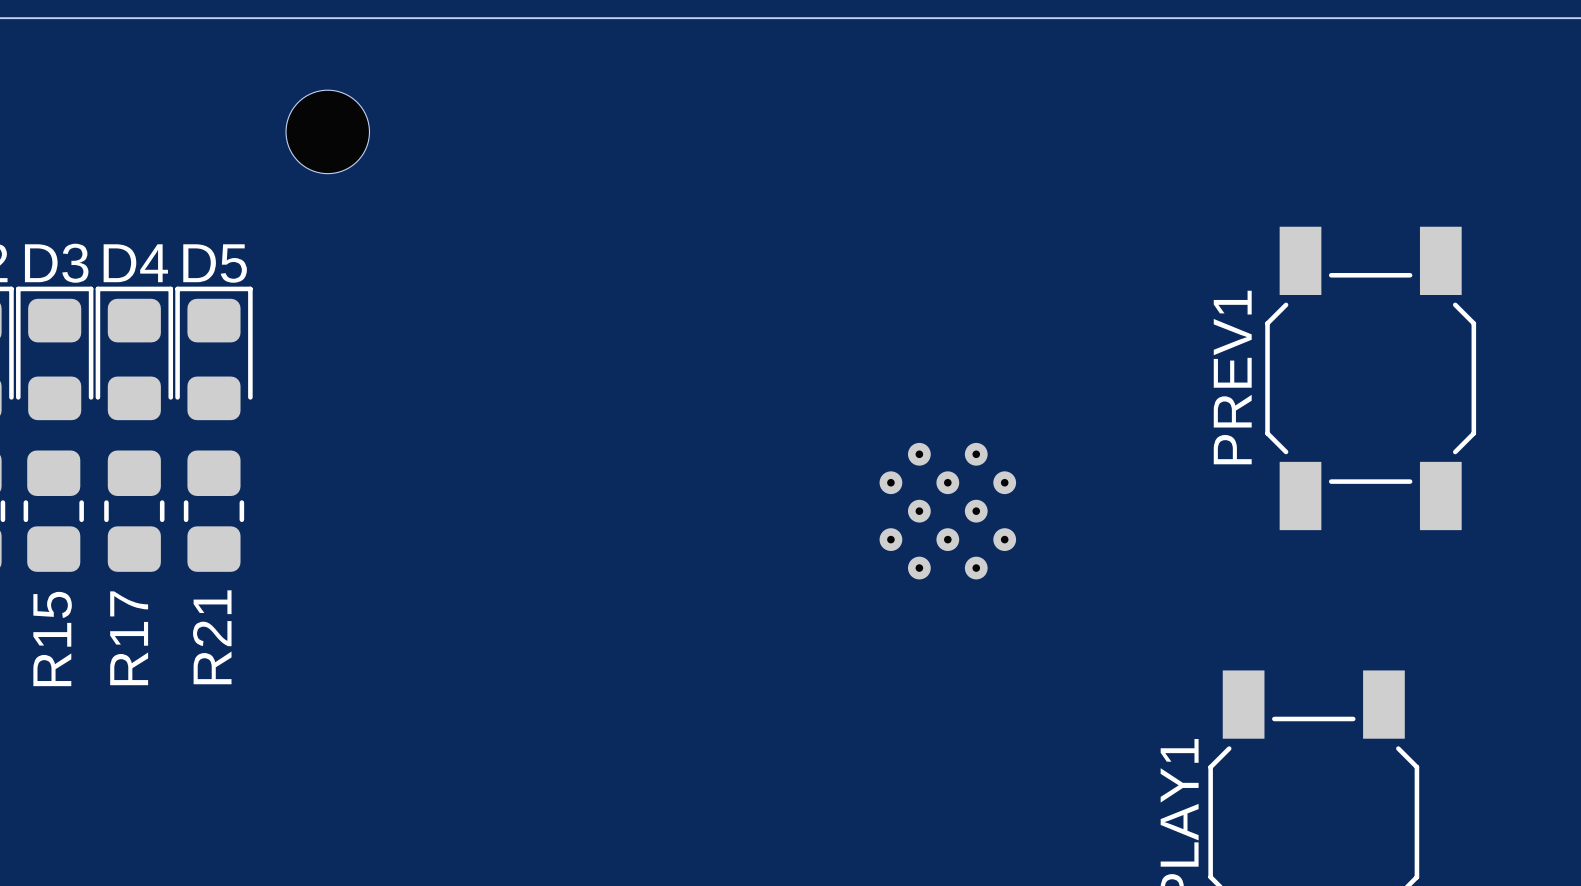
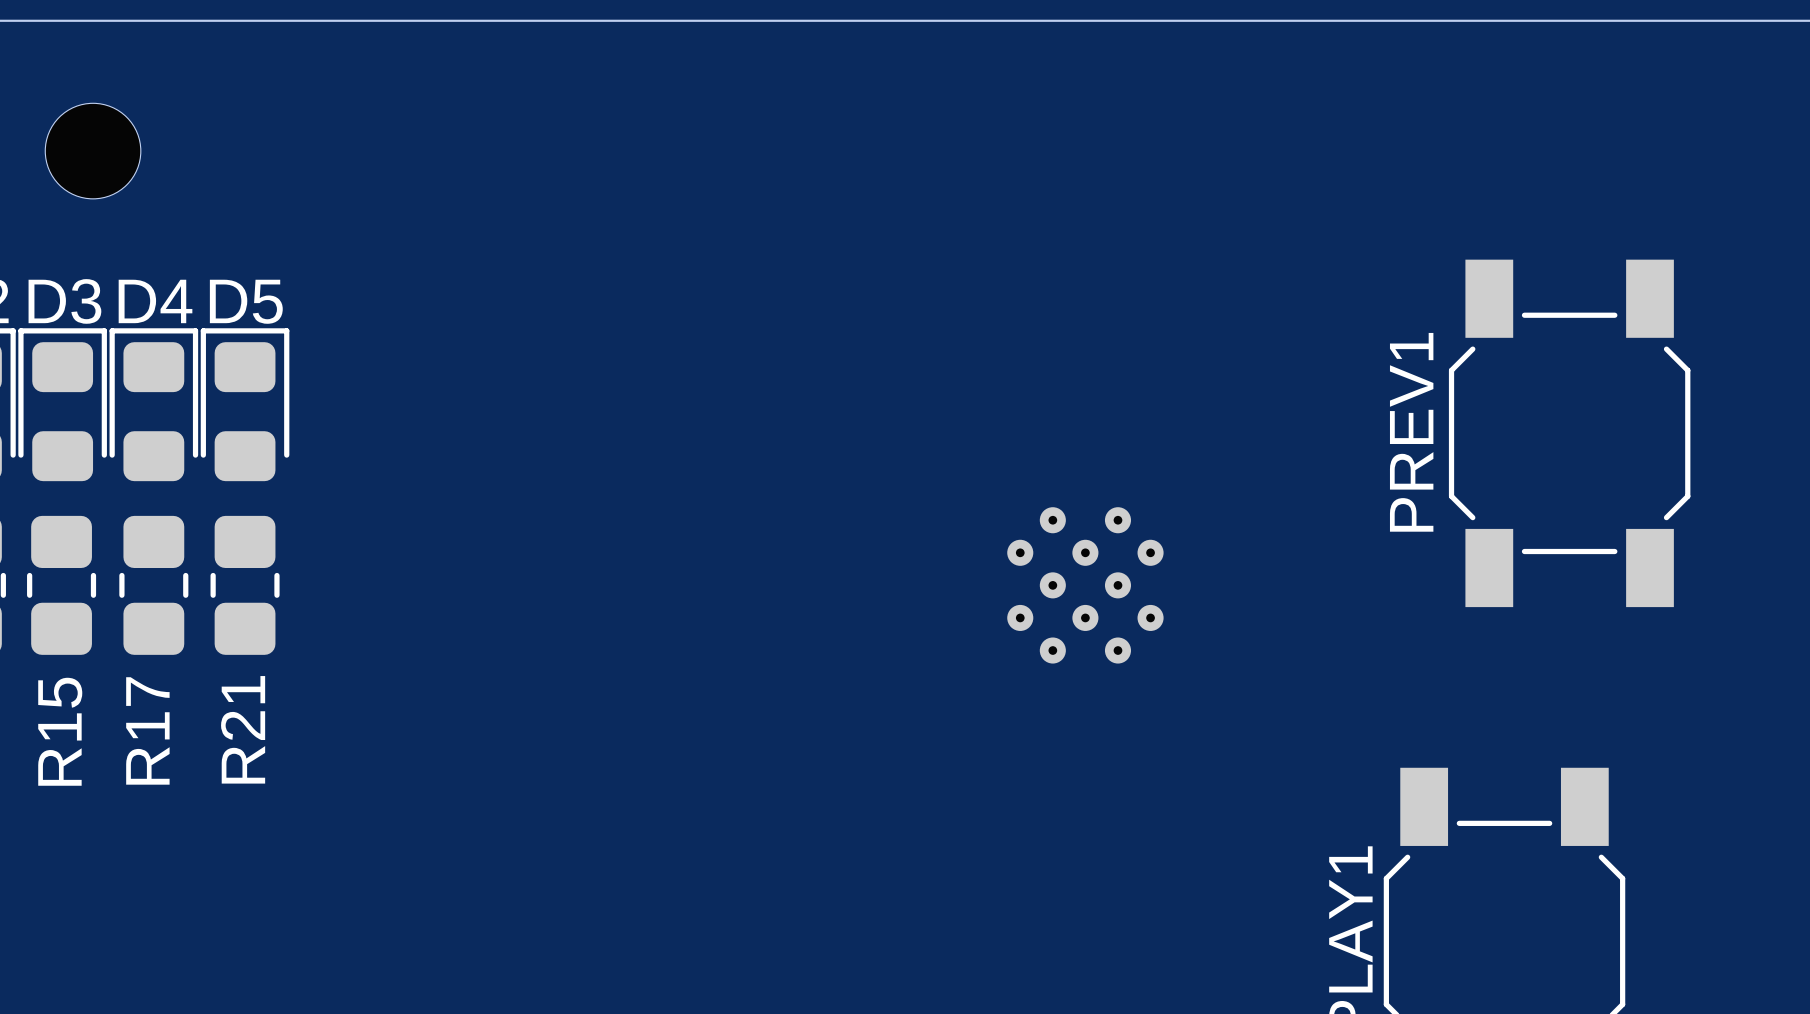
part position: (327, 131) -> (93, 151)

